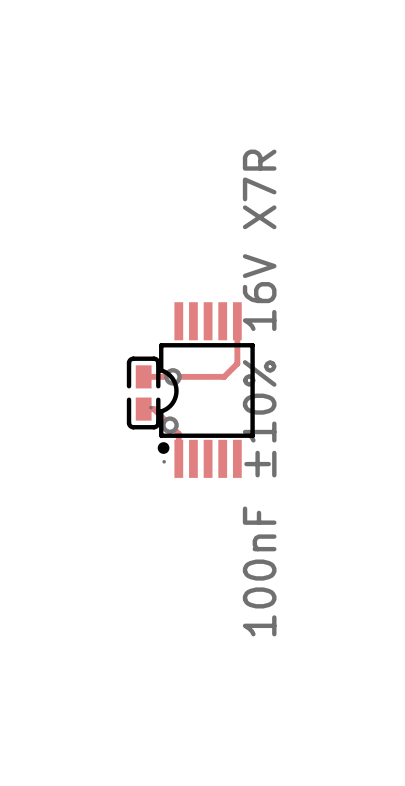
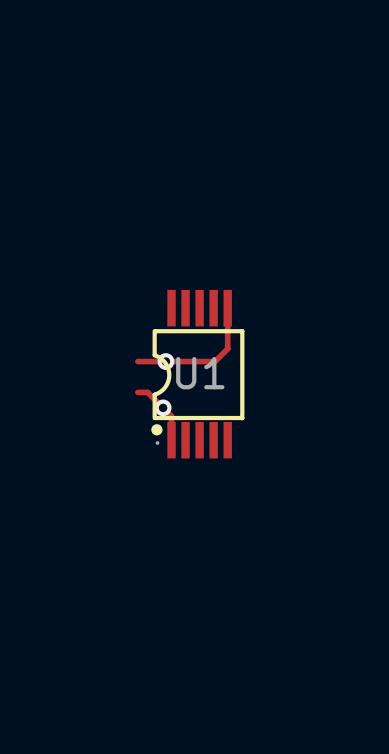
U1 name: none -> U1 (200, 373)
part: 100nF ±10% 16V X7R (143, 392) -> none

